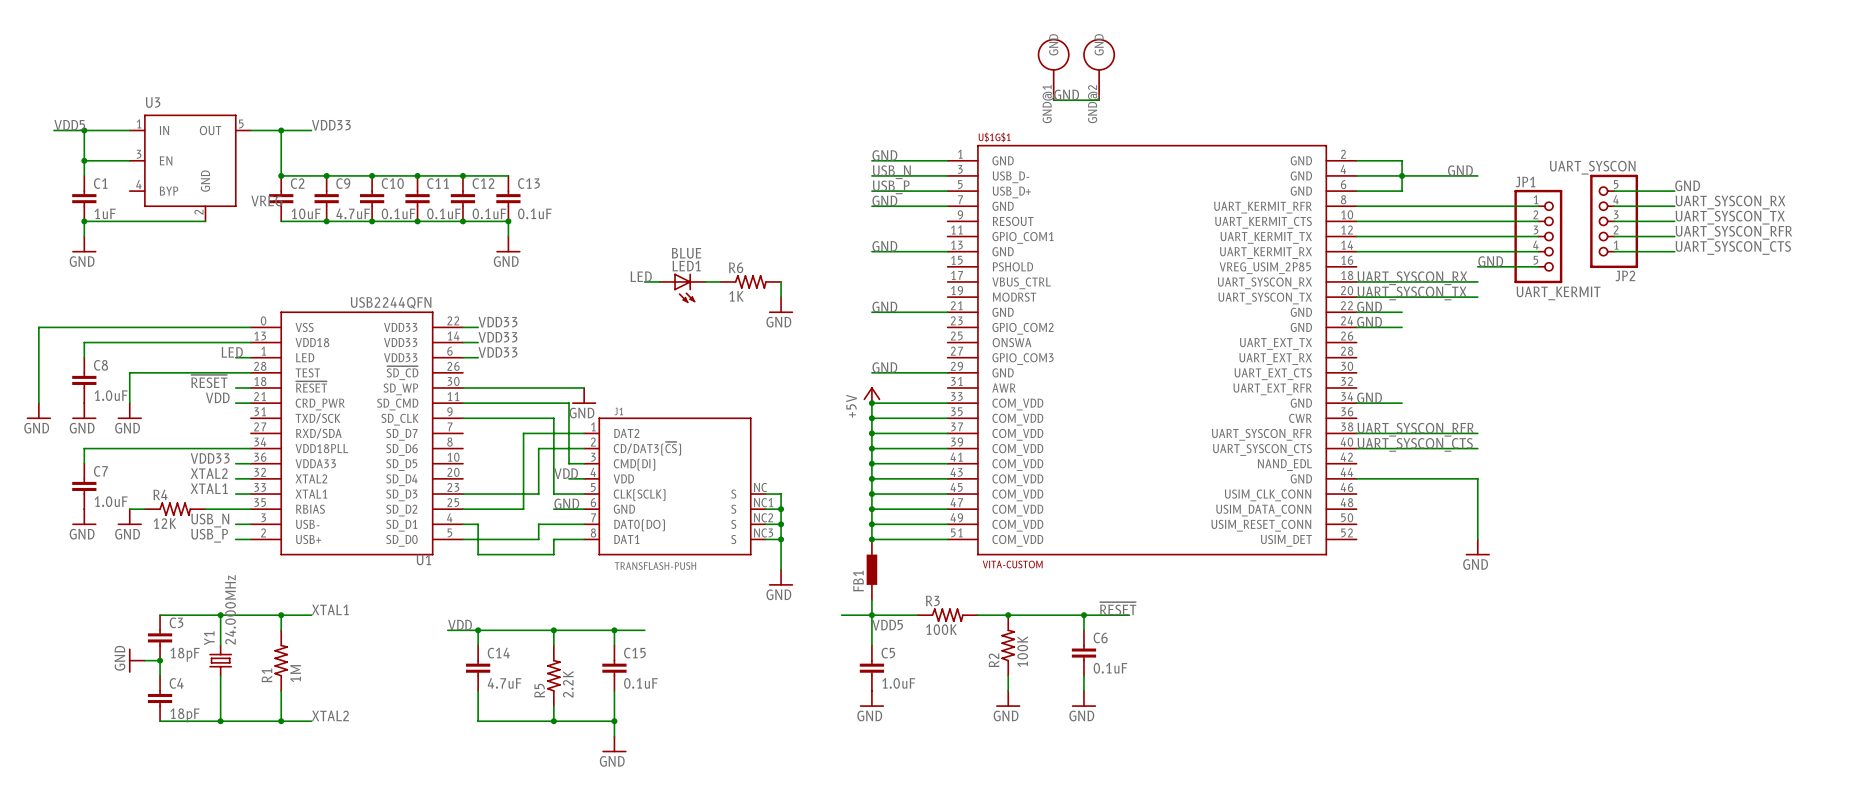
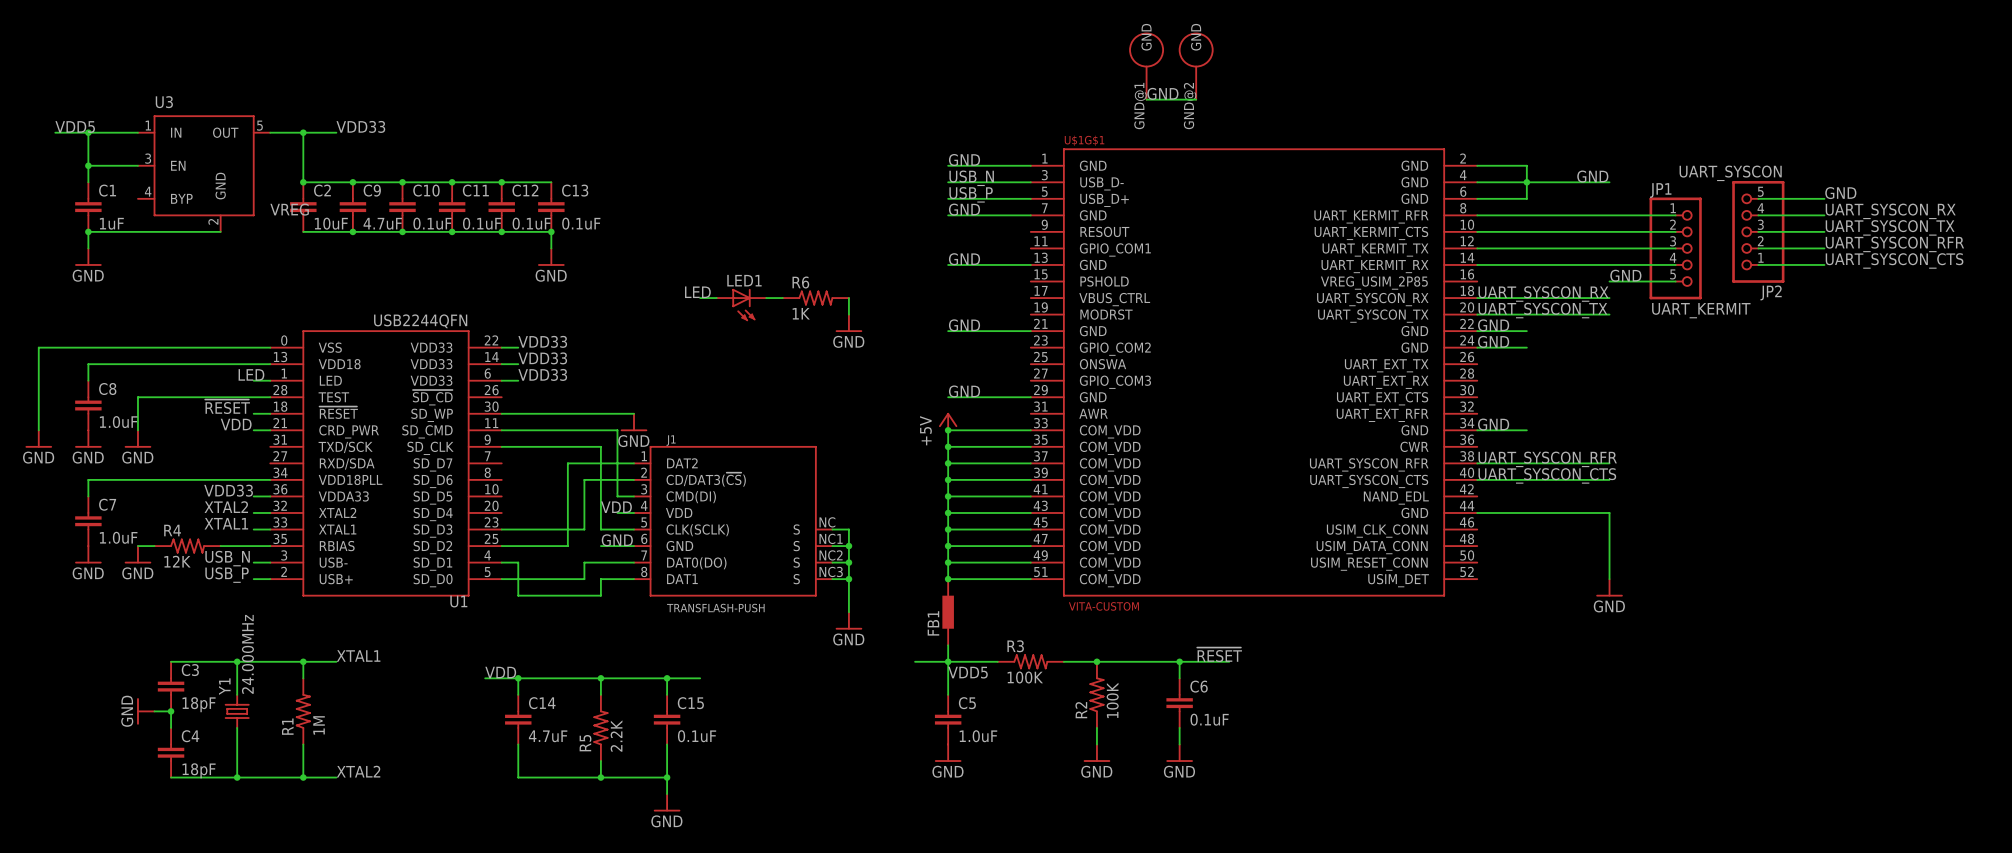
LED1 value: BLUE (686, 253) -> none

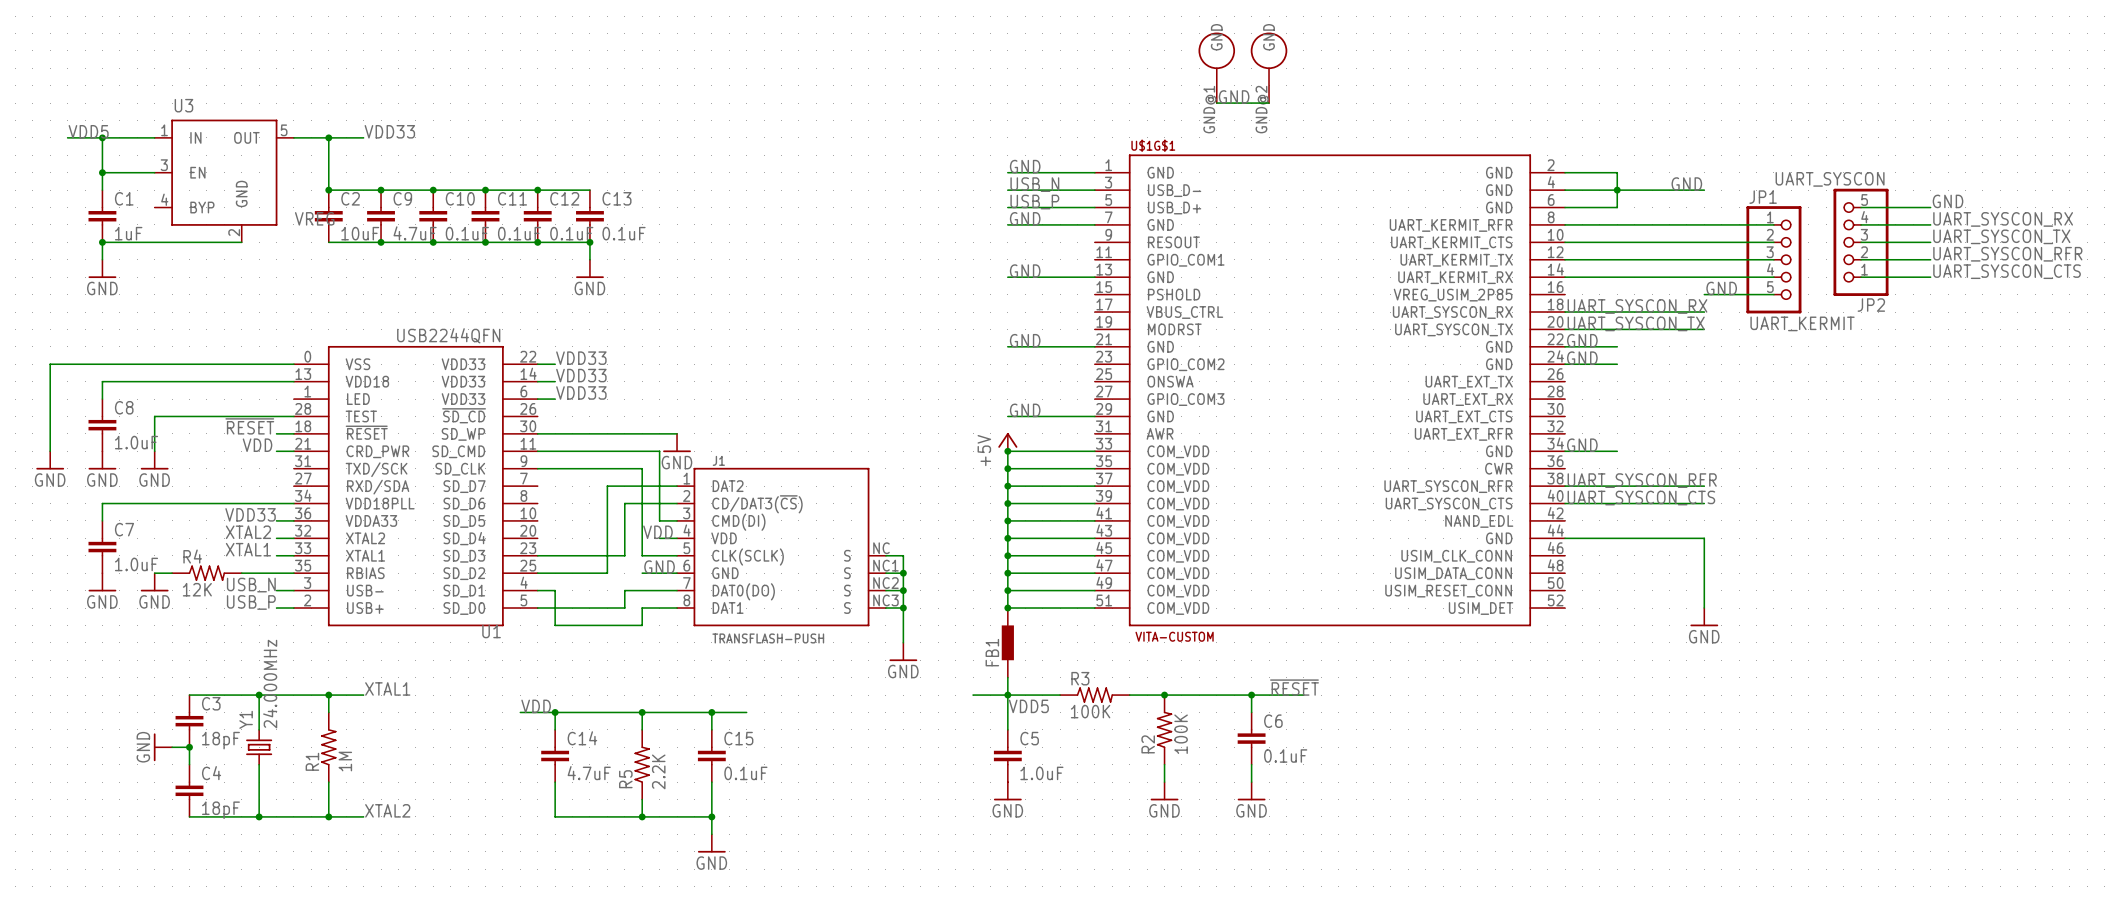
label: LED (697, 292) -> none
wire: (700, 298) (716, 298) -> none
wire: (766, 298) (782, 298) -> none
R6: 1K (815, 298) -> none
wire: (848, 298) (848, 314) -> none
LED1: (741, 304) -> none
power symbol: GND (848, 323) -> none
label: LED (251, 374) -> none
wire: (253, 380) (270, 380) -> none

